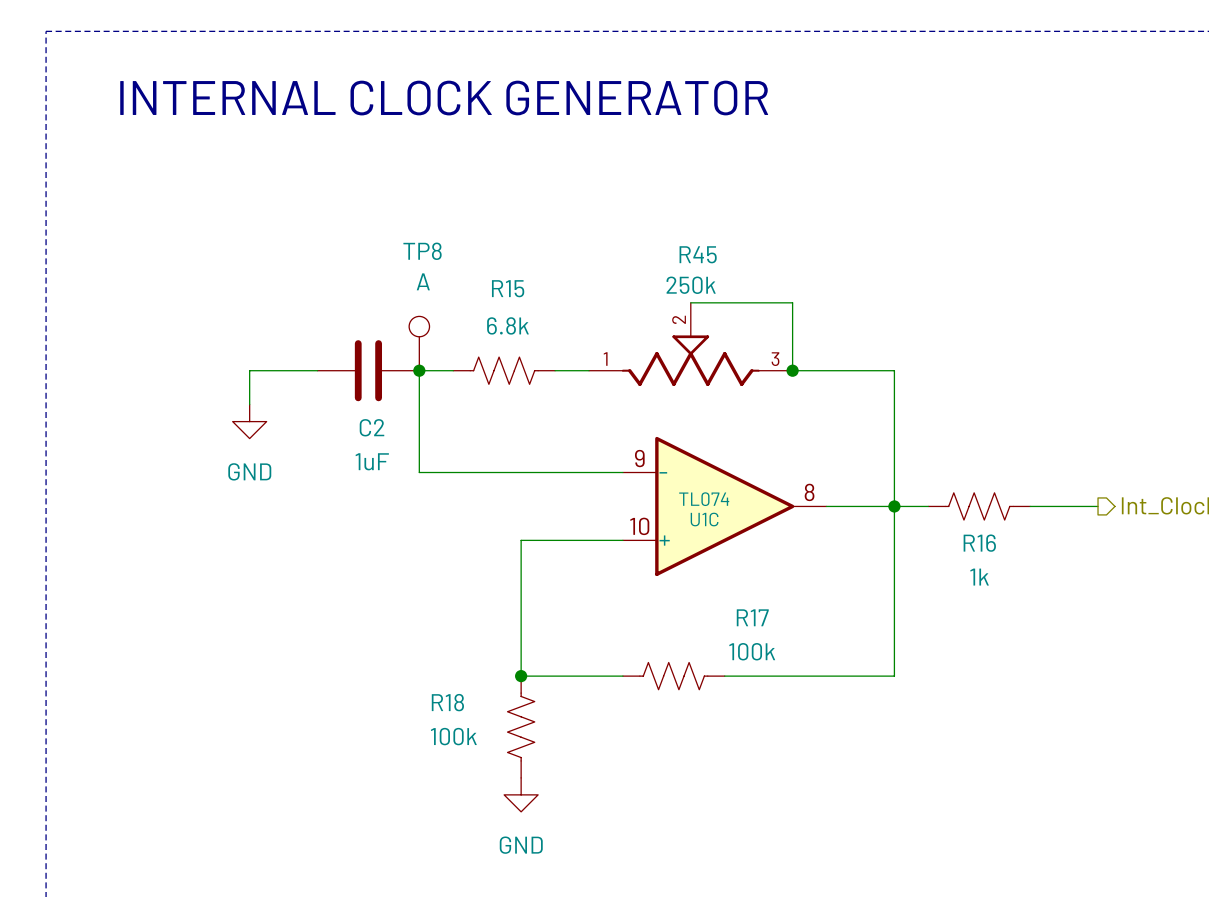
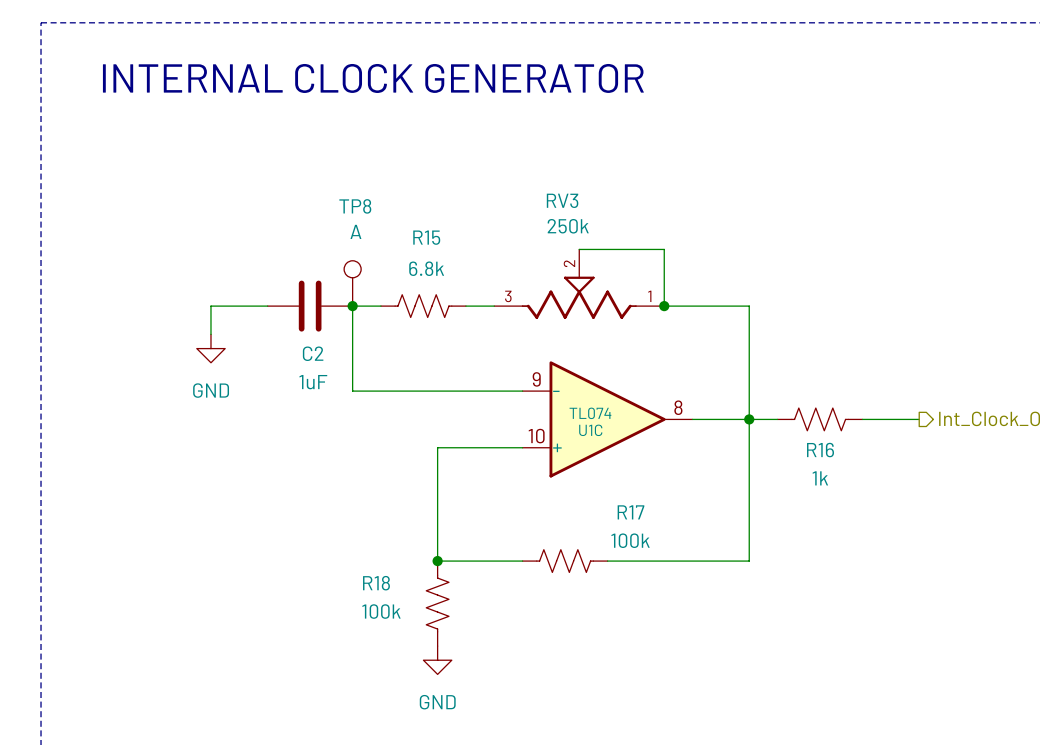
R45 name: R45 (698, 254) -> RV3 (562, 200)
R45 flip: as is (690, 360) -> left-right (579, 297)

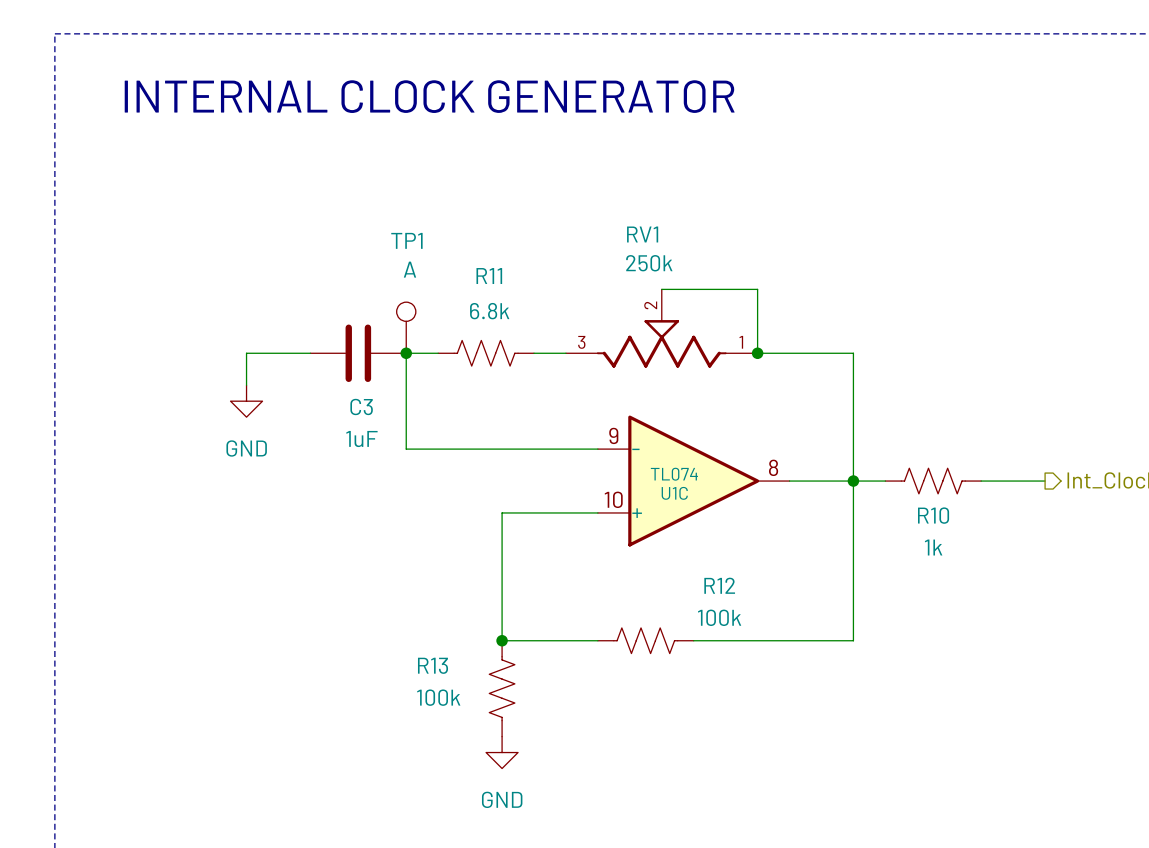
RV3 name: RV3 (562, 200) -> RV1 (642, 234)
TP8 name: TP8 (355, 206) -> TP1 (406, 240)
R15 name: R15 (426, 237) -> R11 (489, 276)
C2 name: C2 (313, 353) -> C3 (361, 406)
R16 name: R16 (820, 450) -> R10 (933, 515)
R17 name: R17 (630, 512) -> R12 (719, 585)
R18 name: R18 (376, 583) -> R13 (433, 665)

